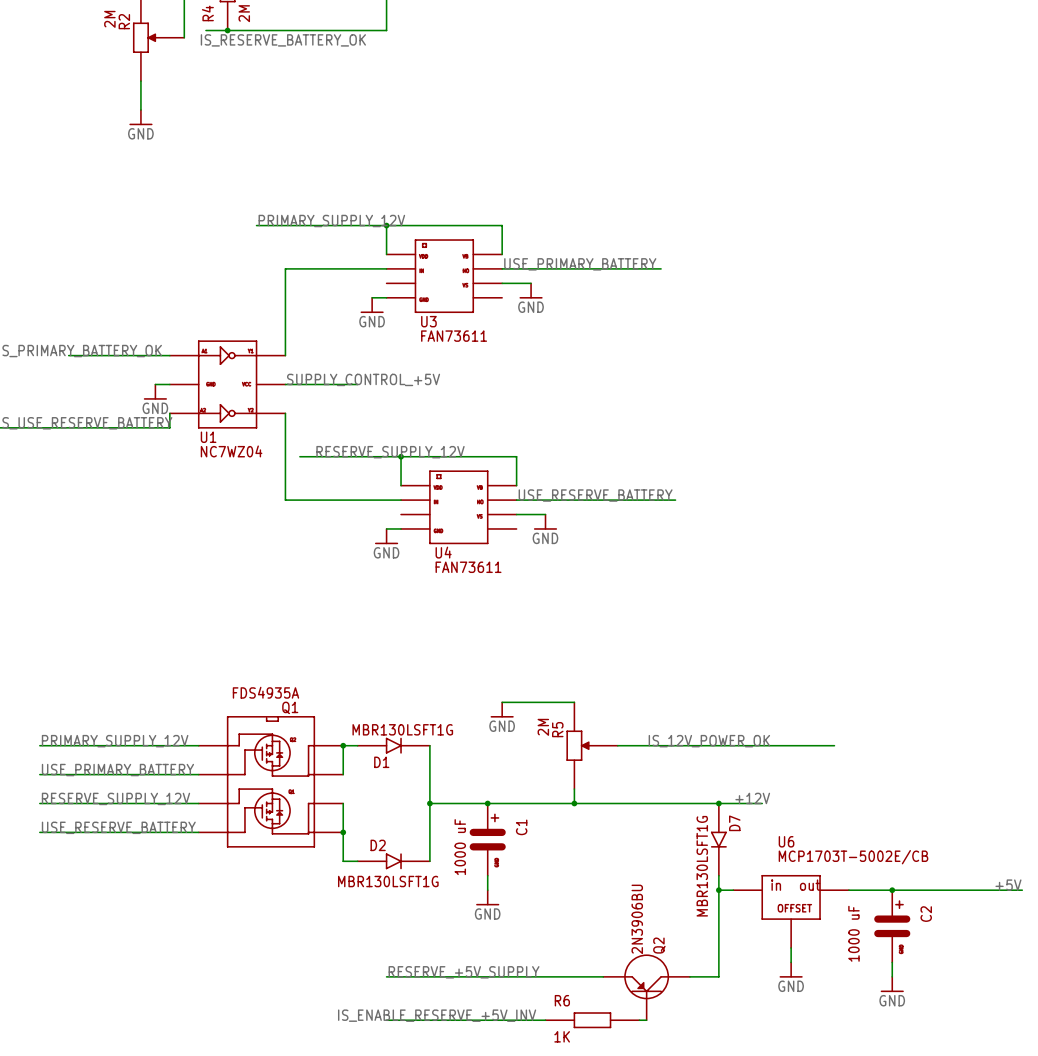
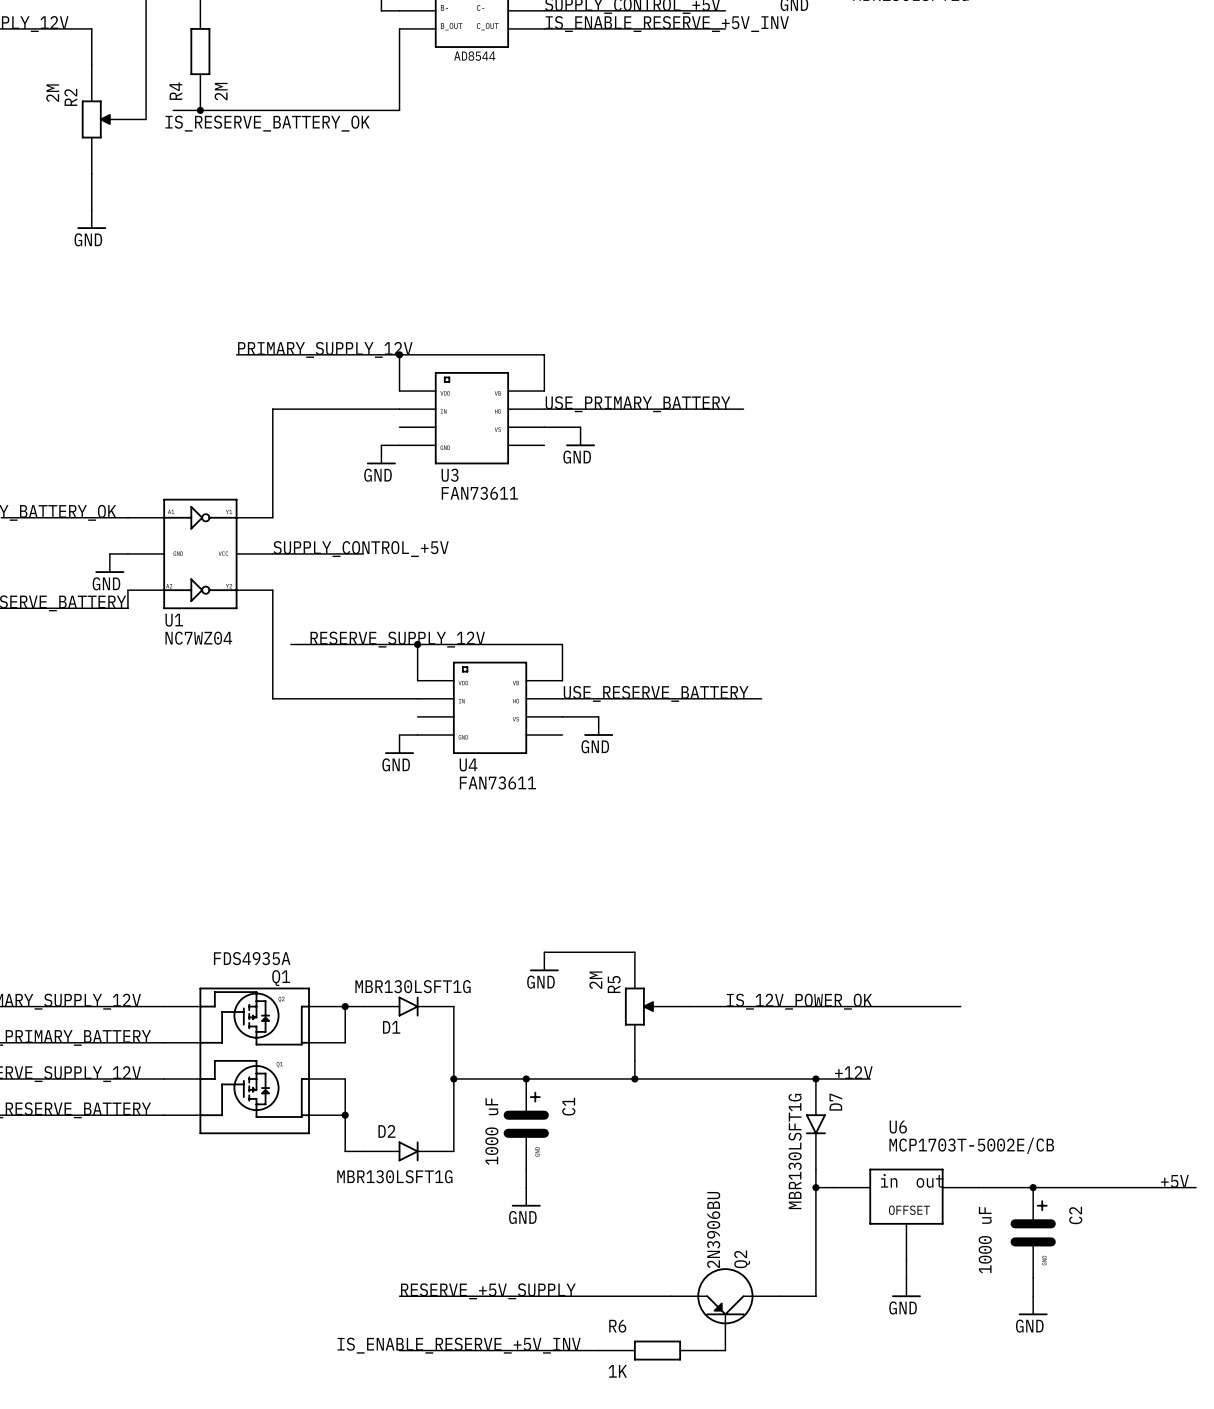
Q1 symbol: [198, 716, 344, 848] -> [164, 987, 346, 1135]

